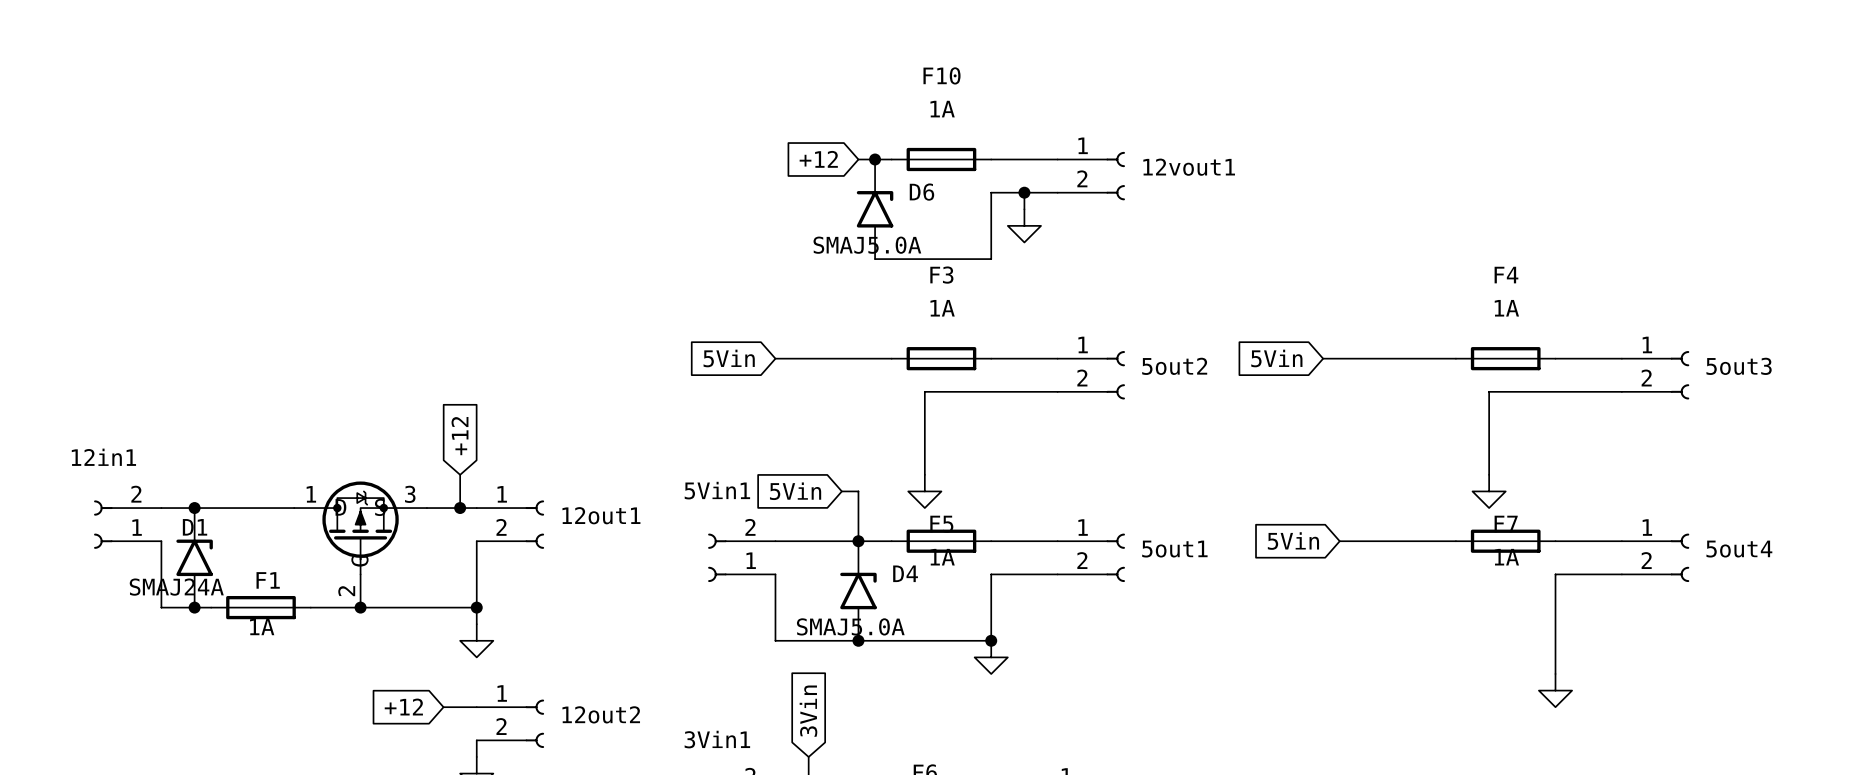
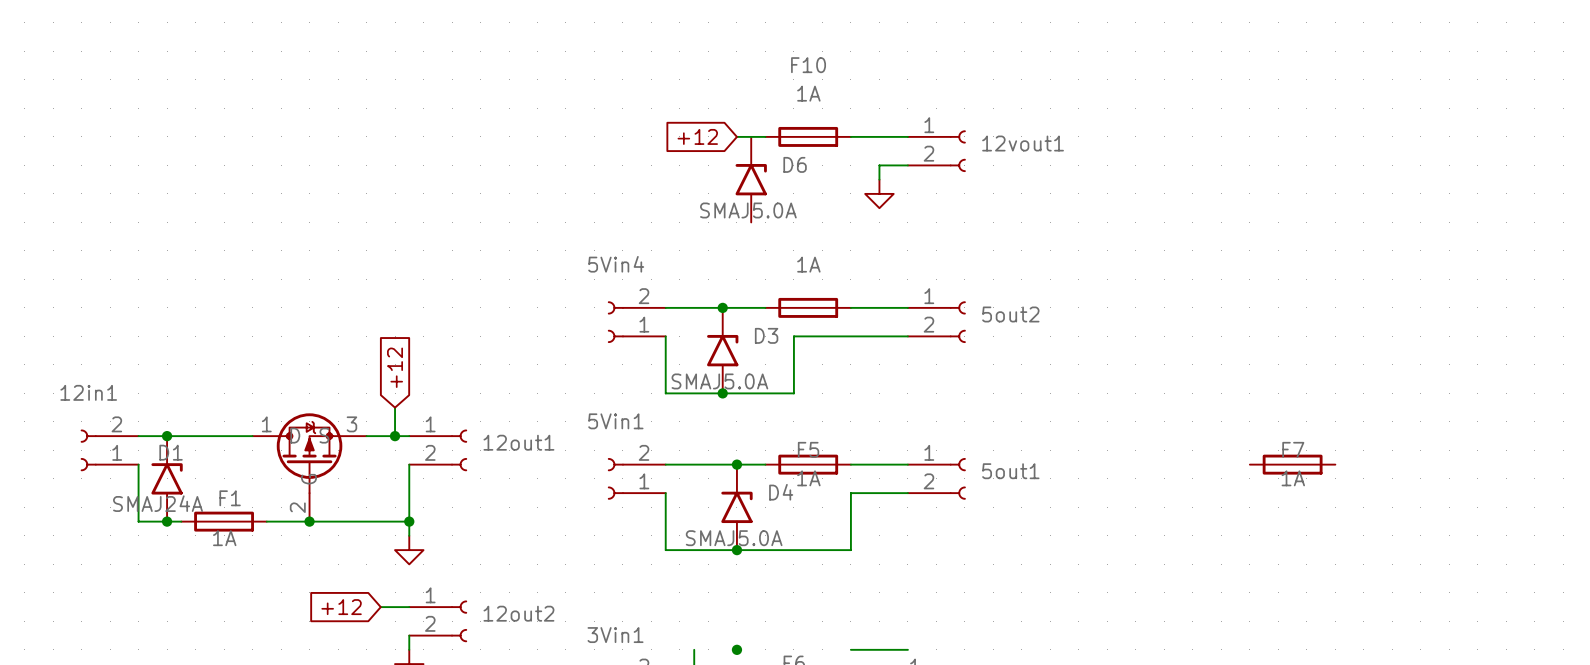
junction: (875, 159) -> none
wire: (1024, 192) (991, 192) (991, 259) (875, 259) -> none
junction: (1024, 192) -> none
F3 name: F3 (941, 275) -> none
global label: 5Vin (729, 358) -> none
junction: none -> (722, 307)
global label: 5Vin (1276, 358) -> none
wire: (1323, 358) (1455, 358) -> none
F4: 1A (1505, 358) -> none
wire: (1555, 358) (1621, 358) -> none
5Vin4: none -> (636, 322)
5out3: (1655, 375) -> none
wire: (1621, 391) (1489, 391) (1489, 474) -> none
D3: none -> SMAJ5.0A (722, 350)
junction: none -> (722, 393)
wire: (924, 458) (924, 474) -> (793, 393) (665, 393) (665, 336)
global label: 5Vin (795, 491) -> none
wire: (841, 491) (858, 491) (858, 541) -> none
power symbol: (924, 491) -> none
power symbol: (1489, 491) -> none
global label: 5Vin (1293, 541) -> none
wire: (1339, 541) (1455, 541) -> none
wire: (1555, 541) (1621, 541) -> none
5out4: (1655, 557) -> none
wire: (1621, 574) (1555, 574) (1555, 673) -> none
junction: (991, 640) -> none
power symbol: (991, 657) -> none
power symbol: (1555, 690) -> none
global label: 3Vin (808, 711) -> none
junction: none -> (736, 649)
wire: none -> (850, 649) (907, 649)

